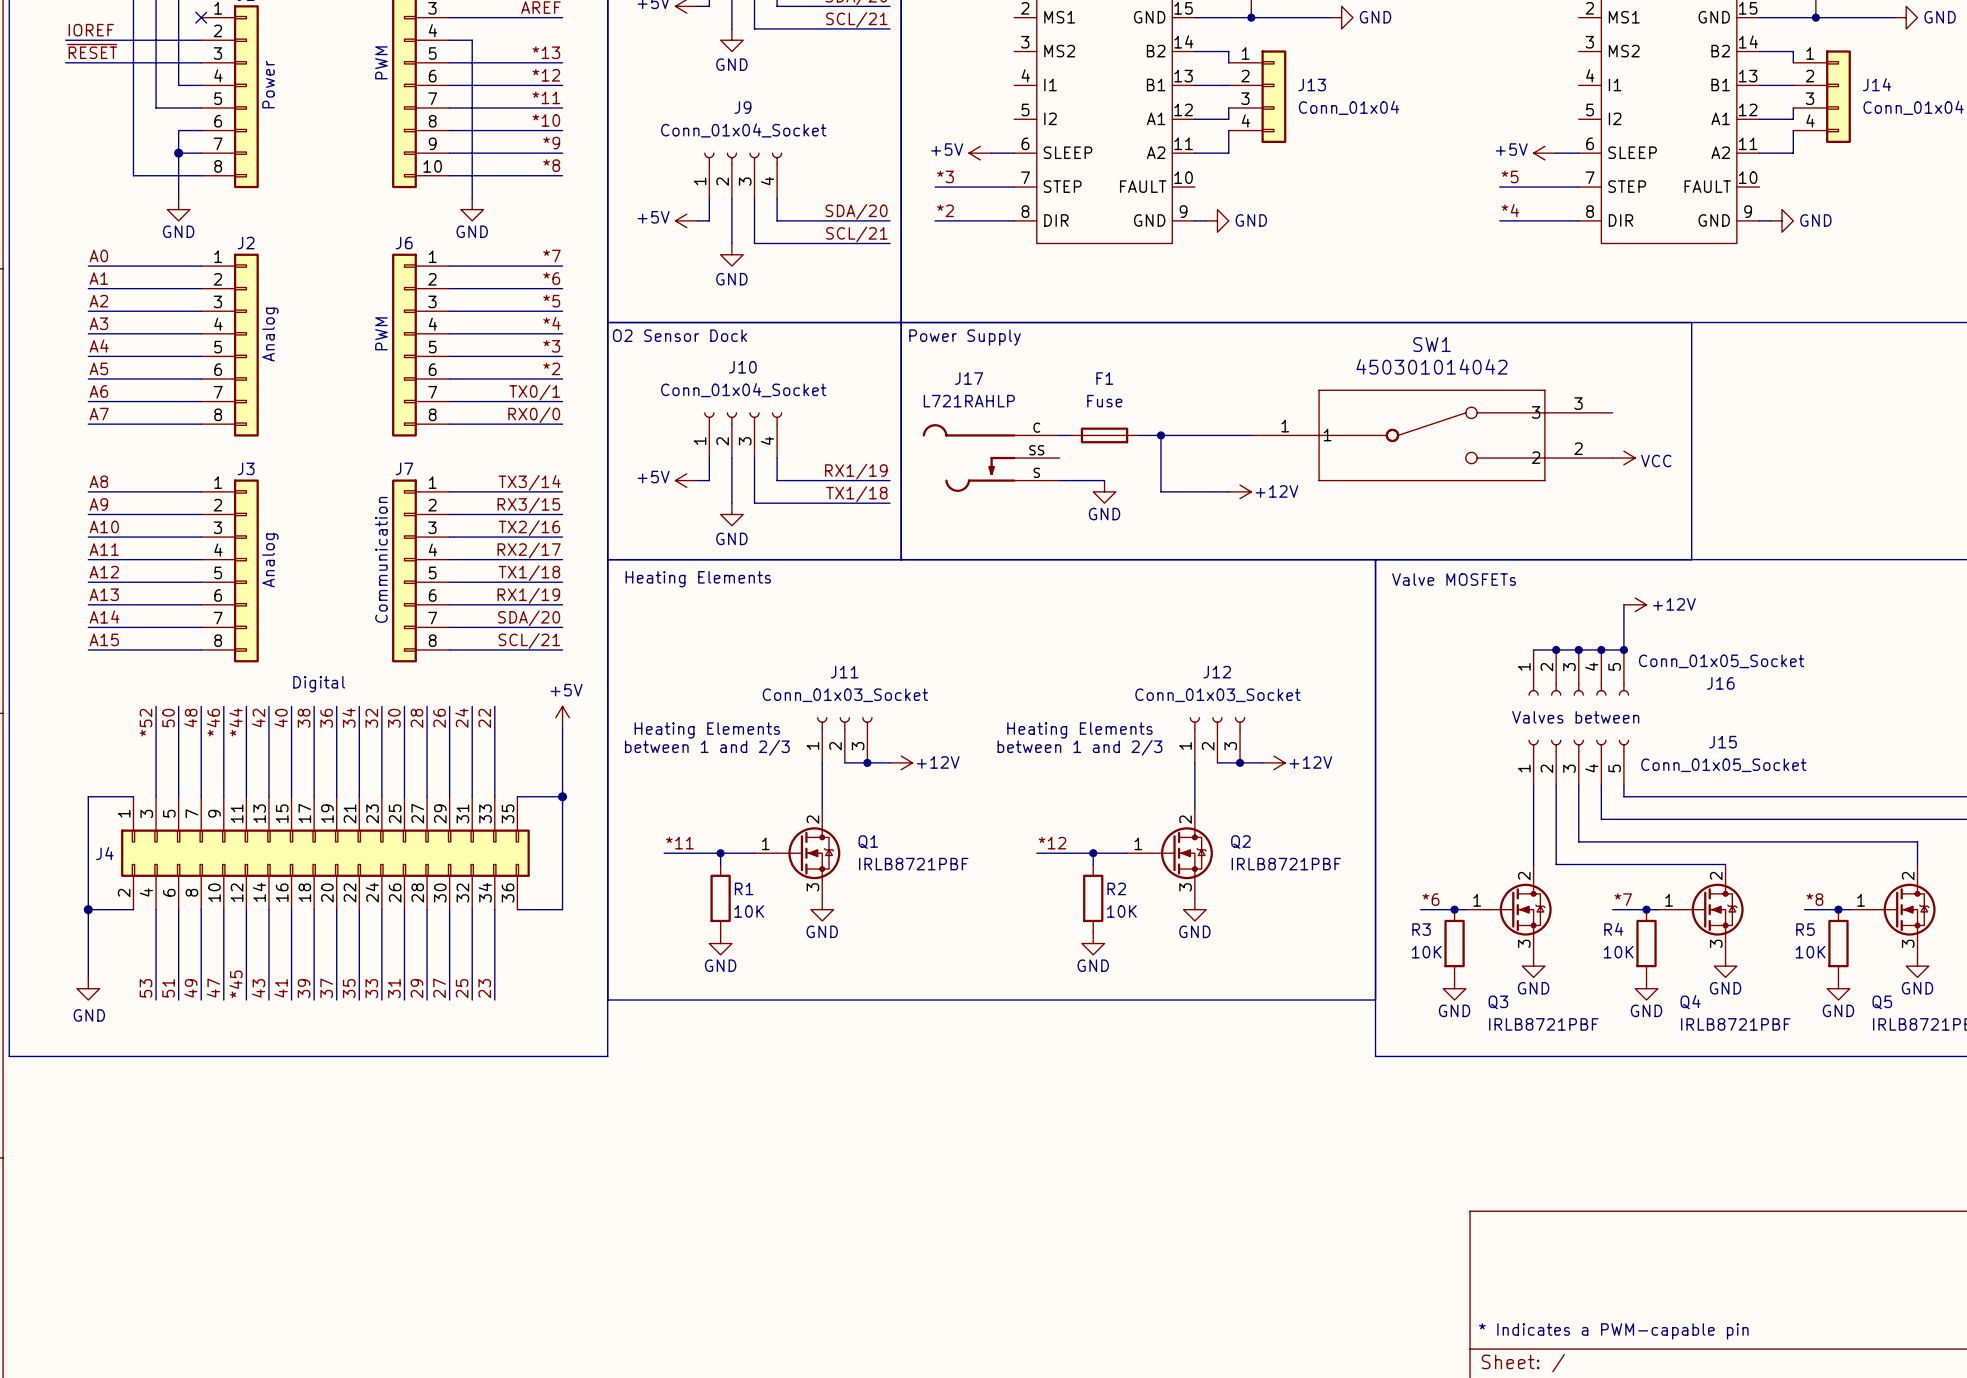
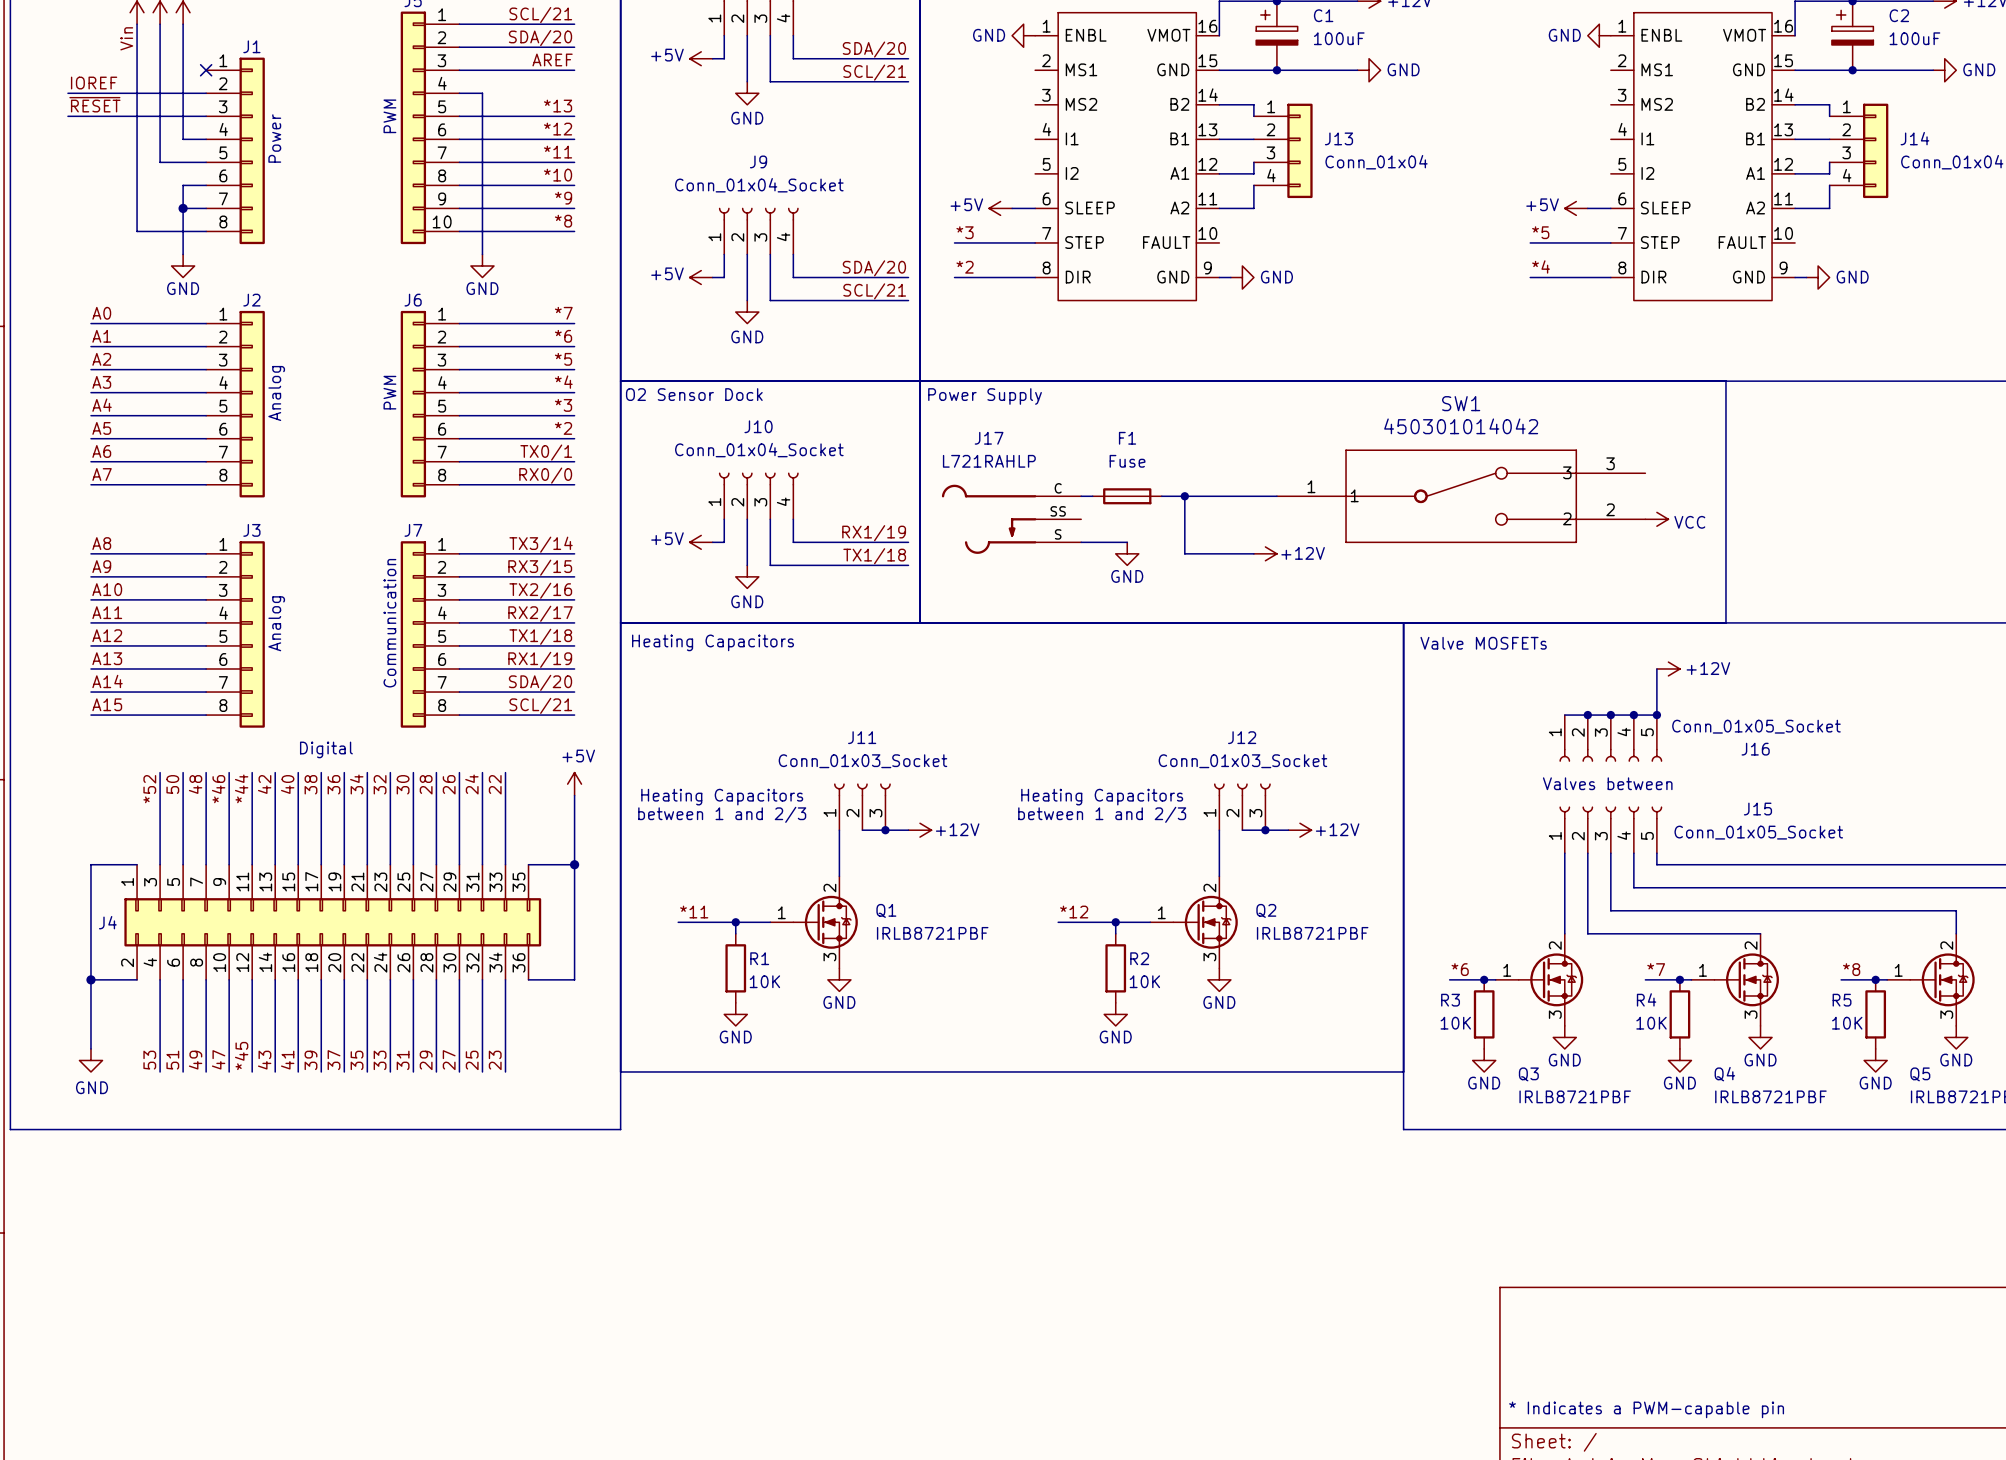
text: Heating Elements (698, 579) -> Heating Capacitors (713, 642)
text: Heating Elements (707, 730) -> Heating Capacitors (722, 797)
text: Heating Elements (1079, 730) -> Heating Capacitors (1102, 797)

